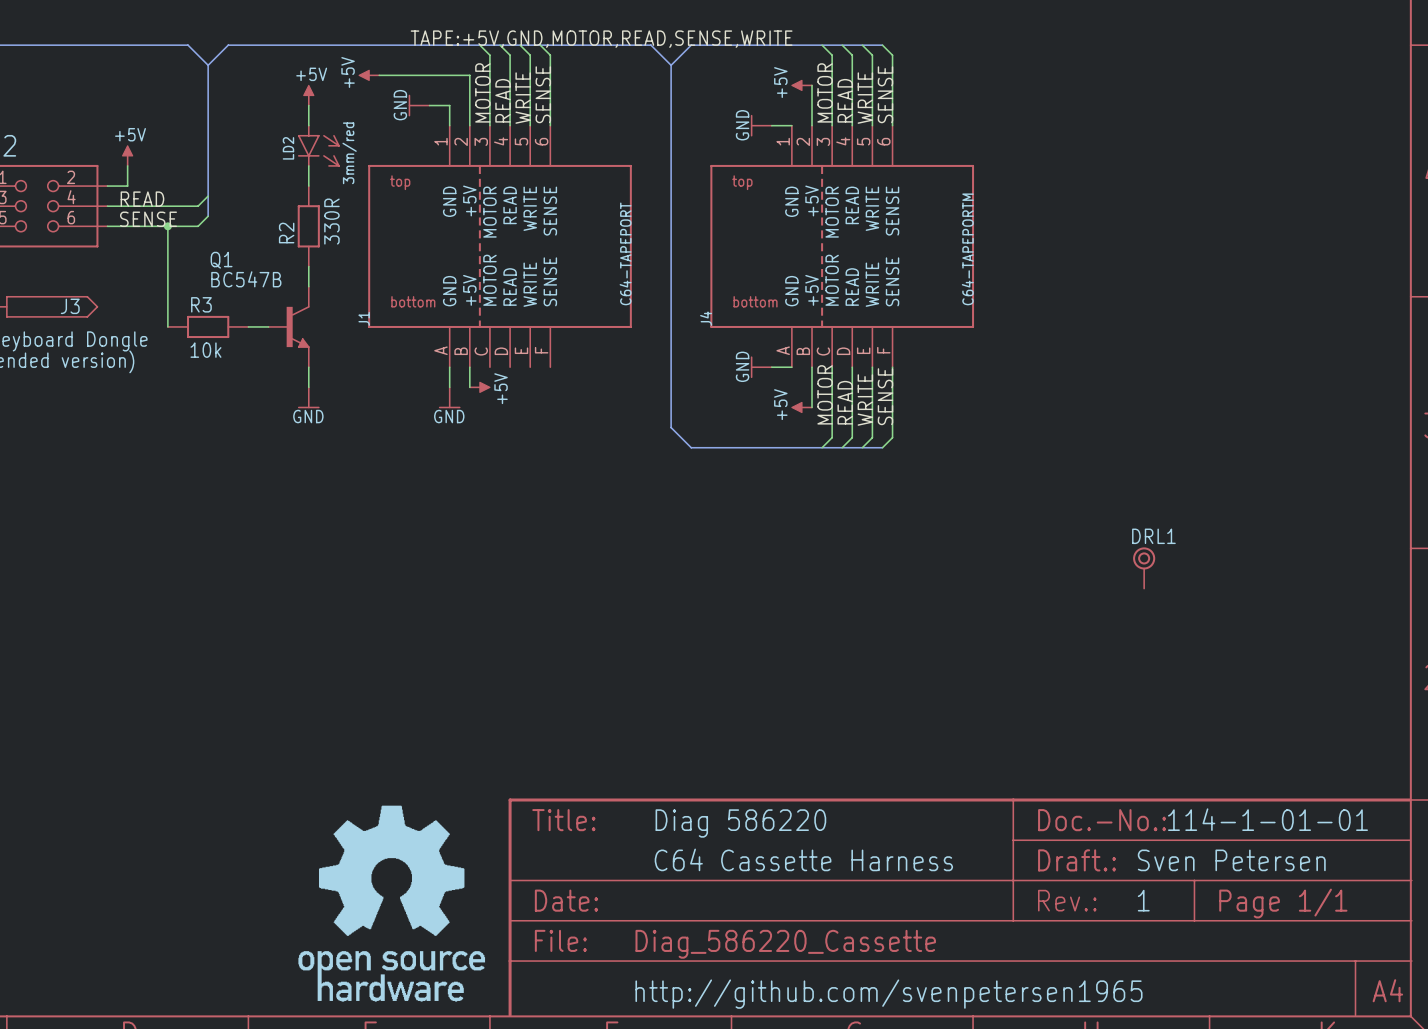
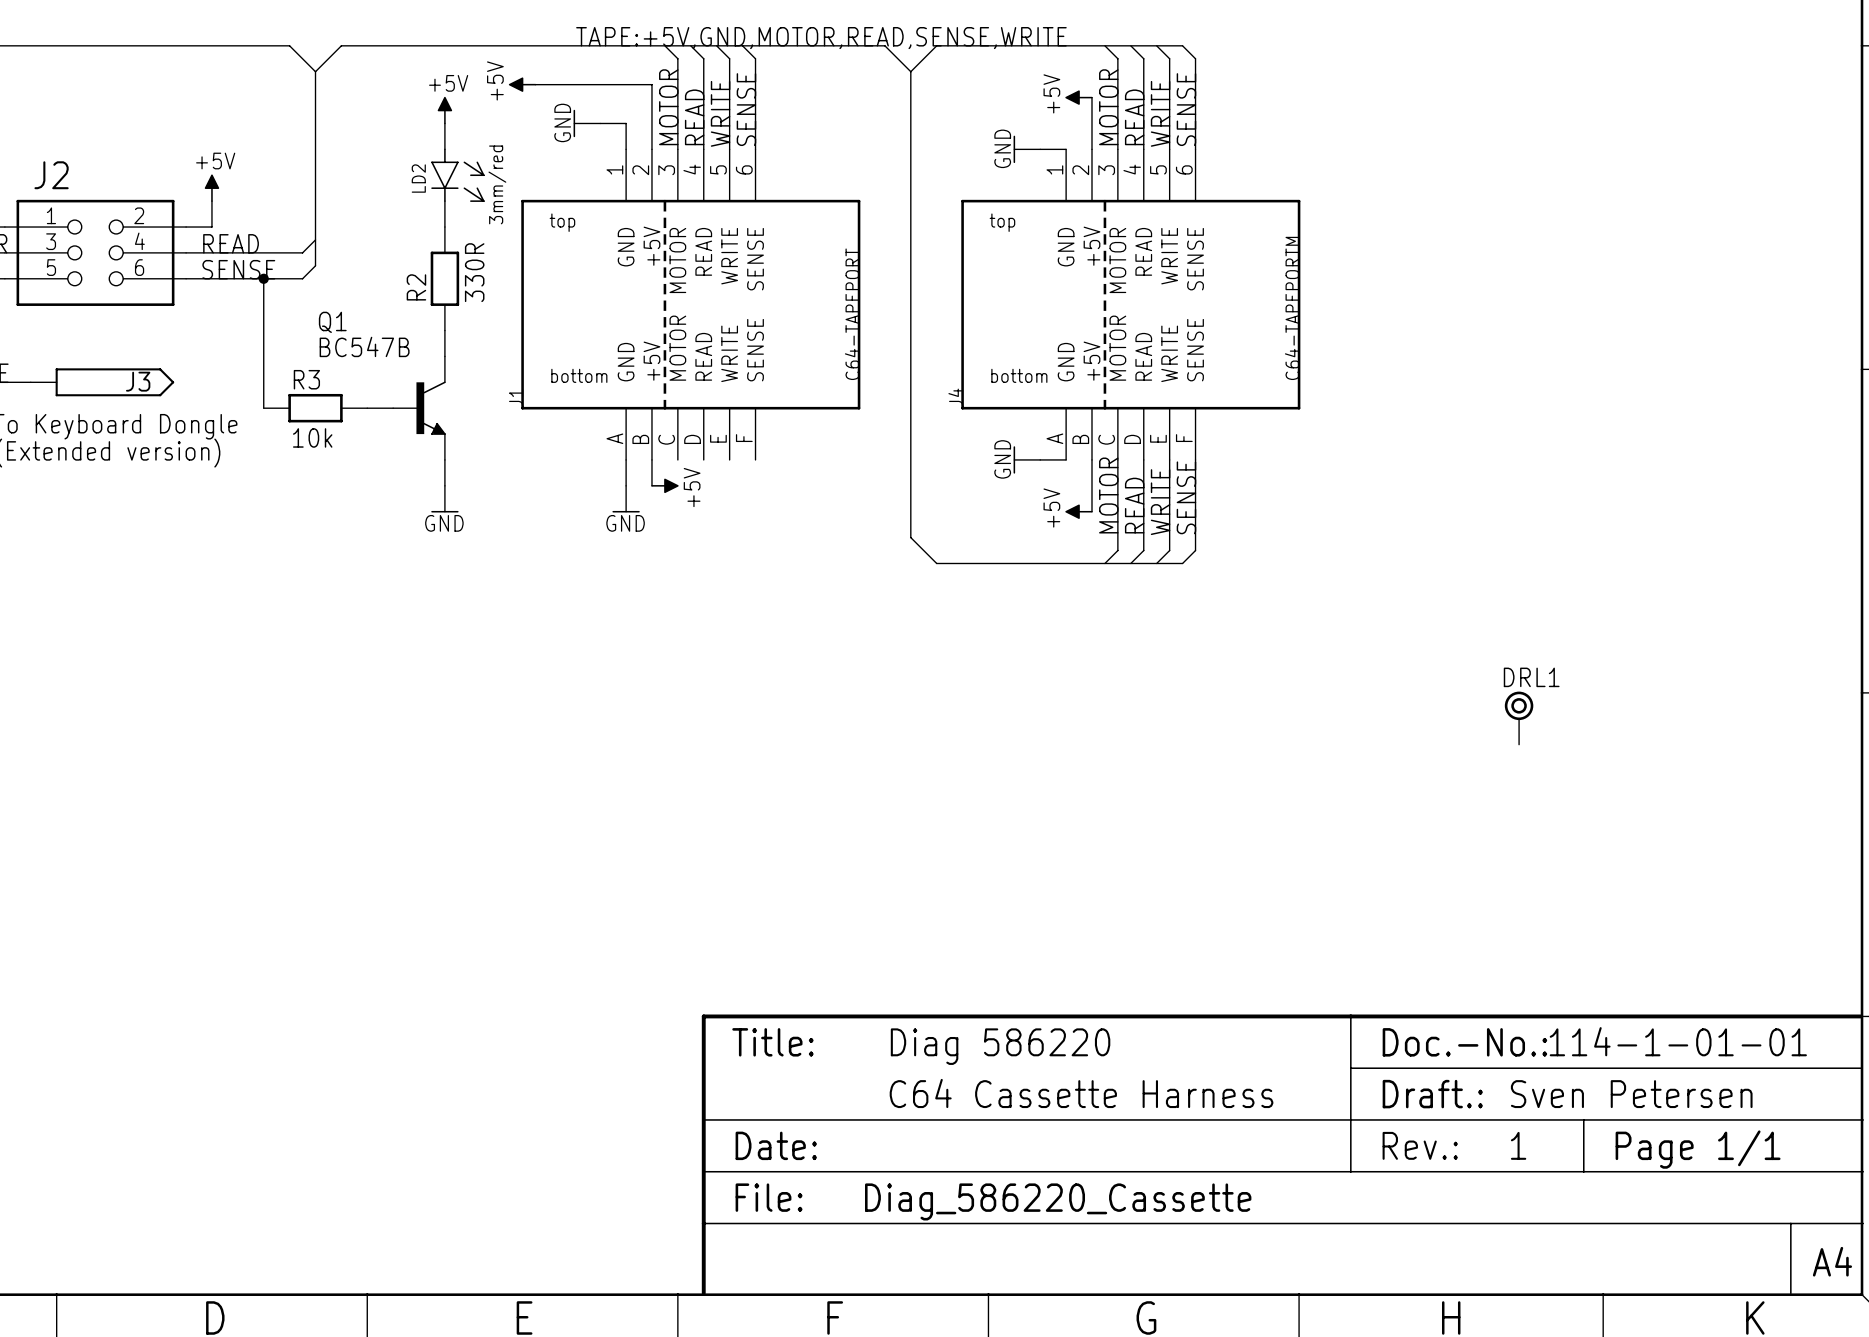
part: (391, 903) -> none
text: http://github.com/svenpetersen1965 (888, 994) -> none

